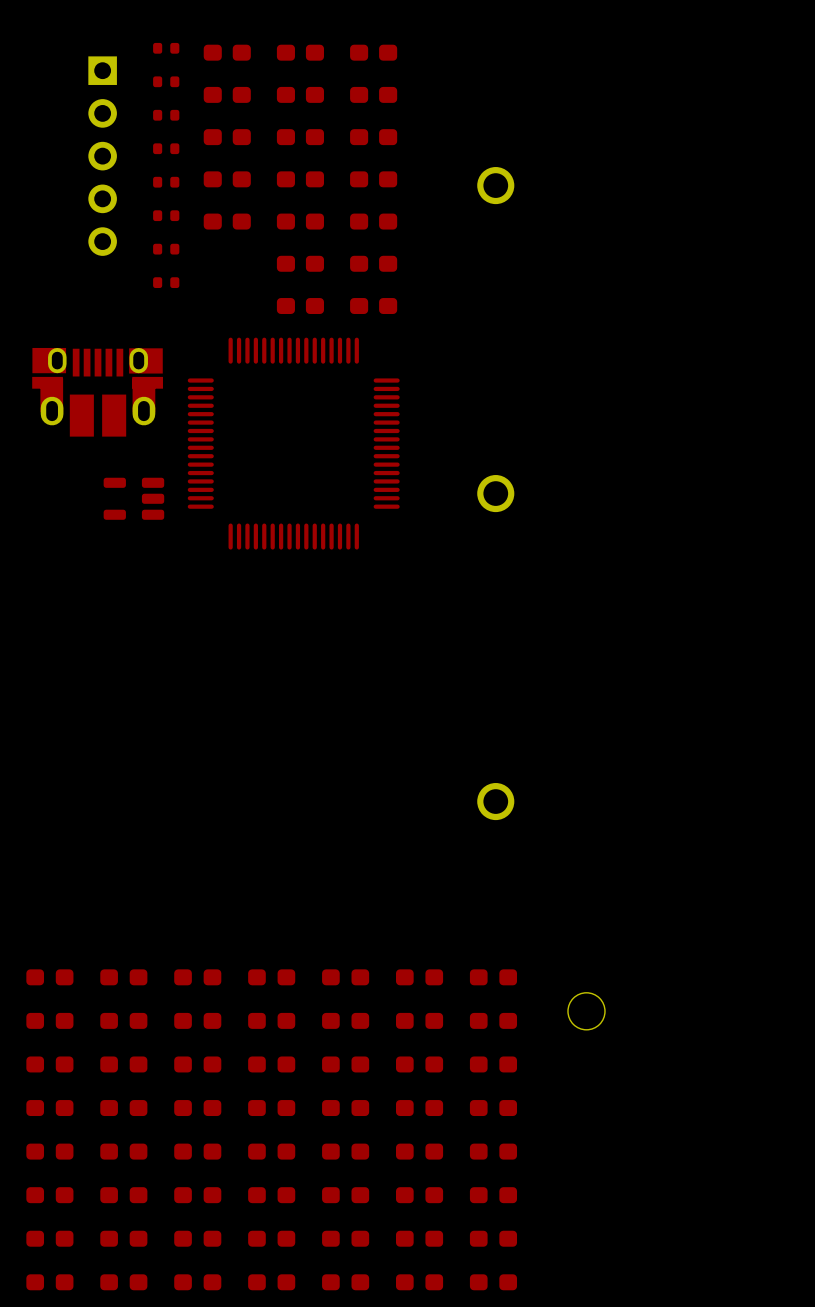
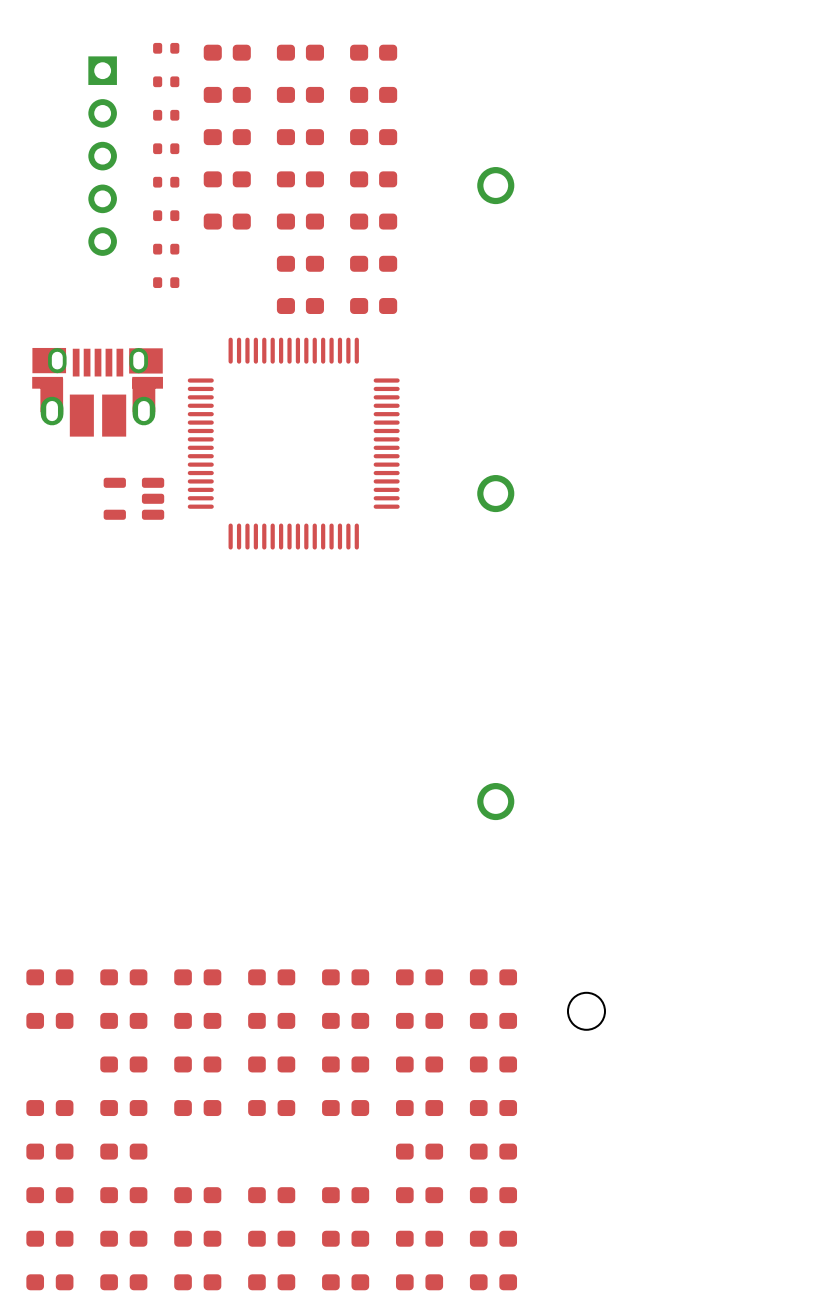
part: (49, 1064) -> none
part: (197, 1151) -> none
part: (271, 1151) -> none
part: (345, 1151) -> none

